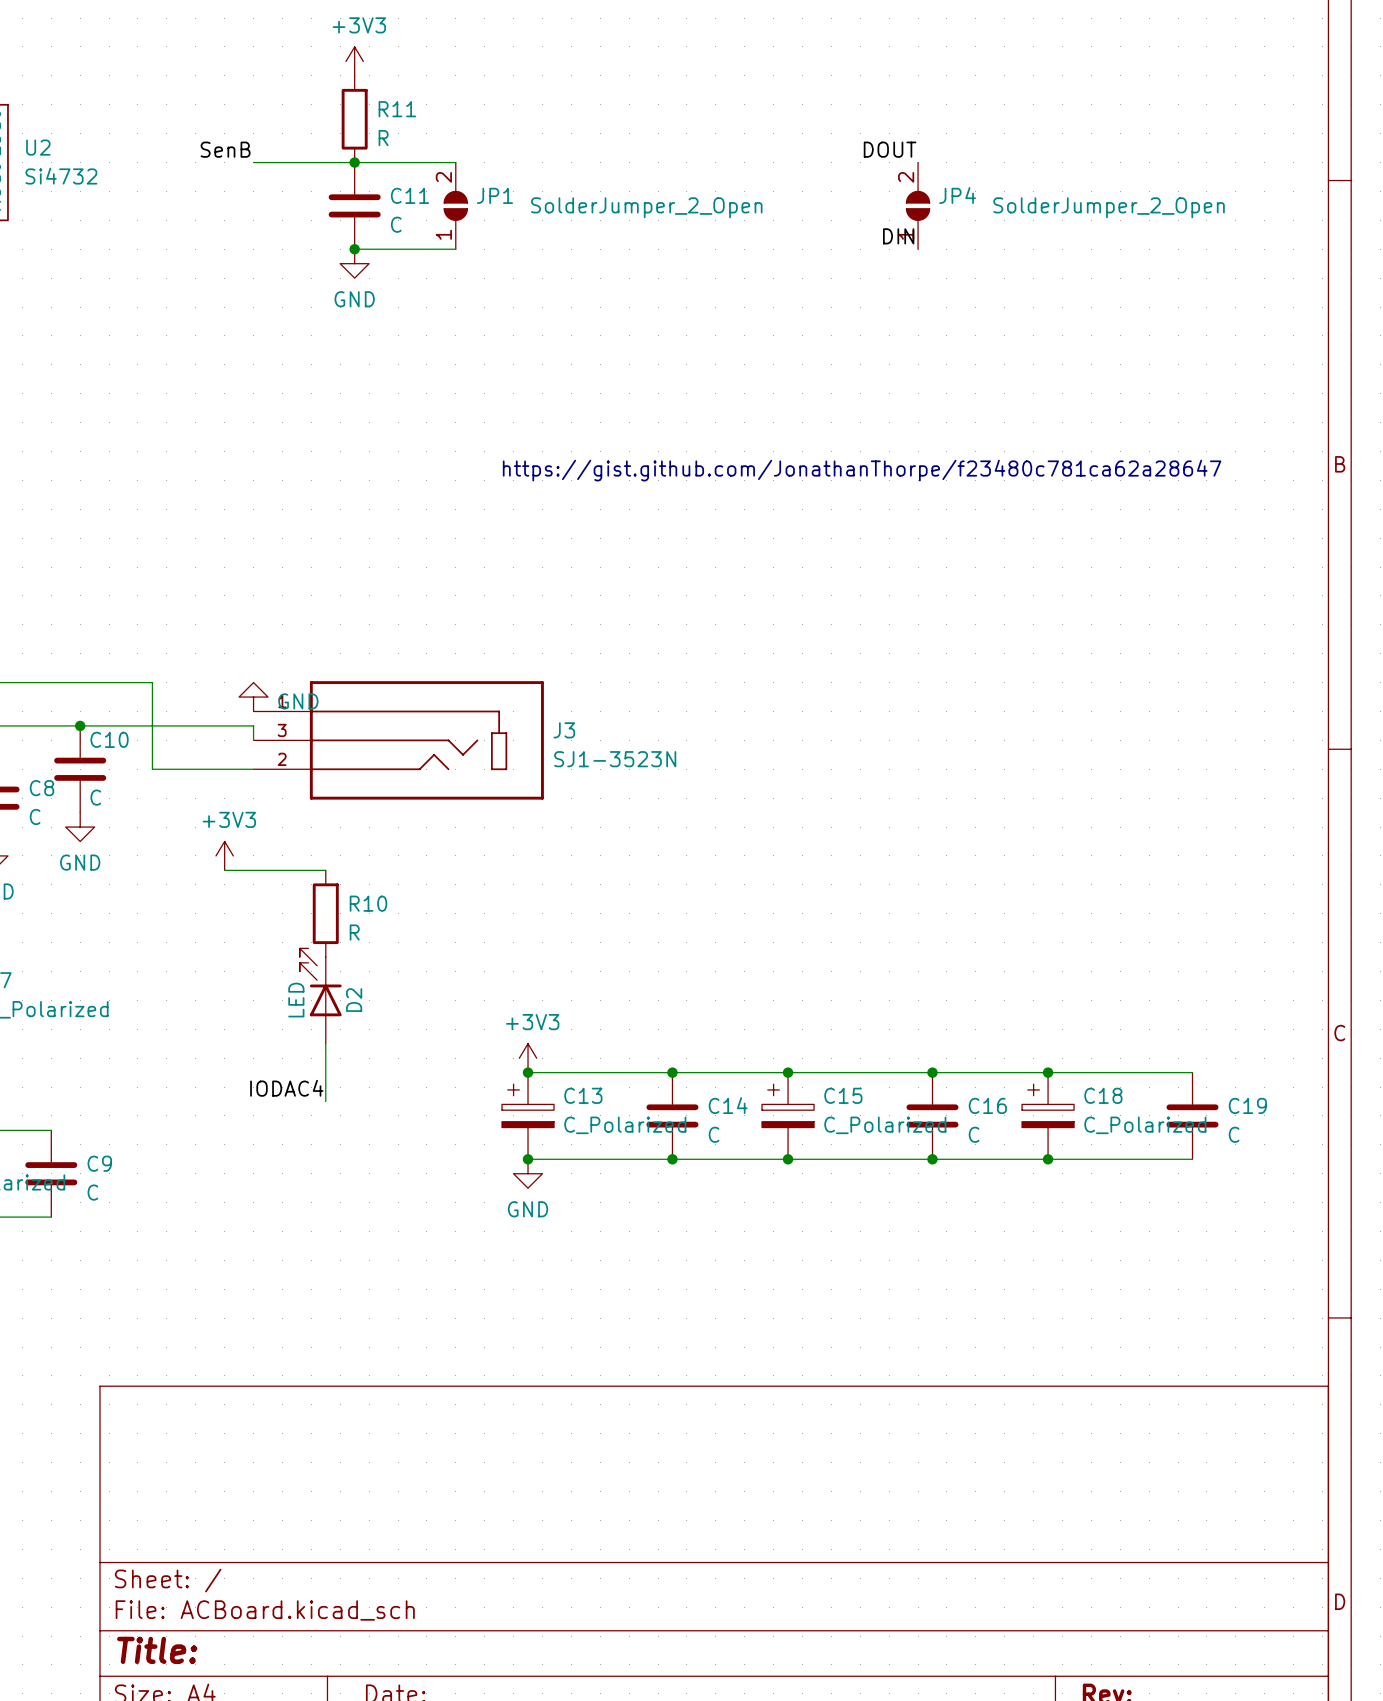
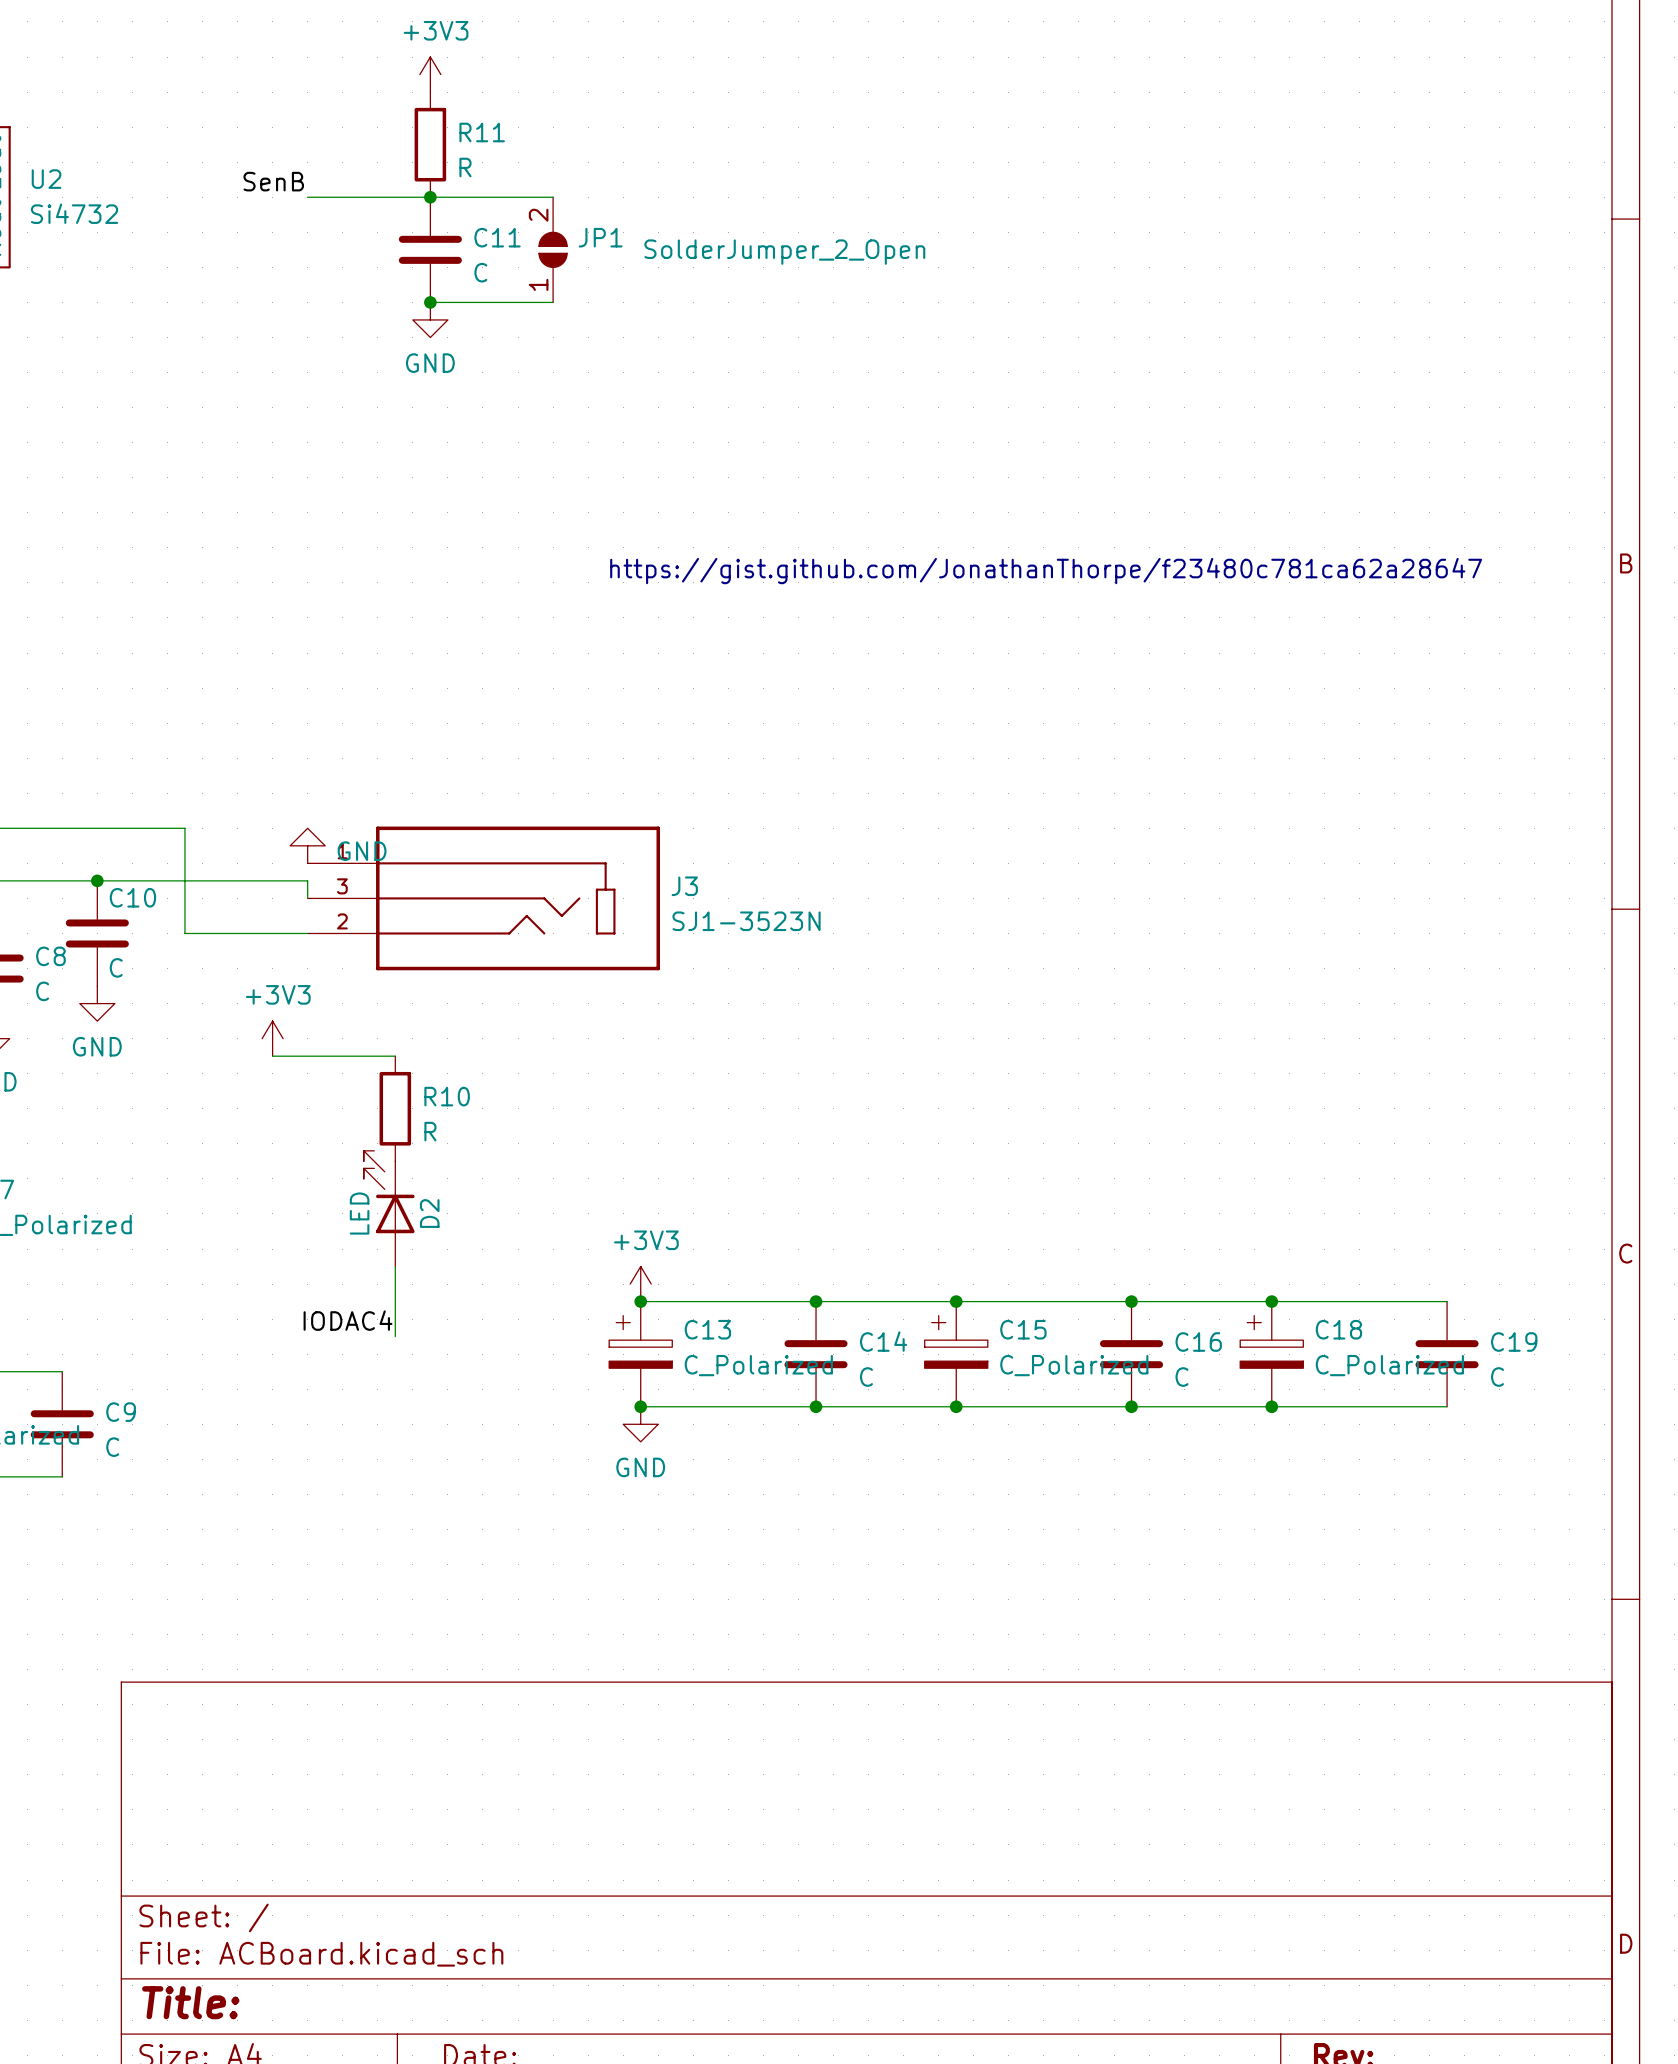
label: DOUT (890, 149) -> none
JP4: SolderJumper_2_Open (918, 205) -> none
label: DIN (898, 236) -> none

